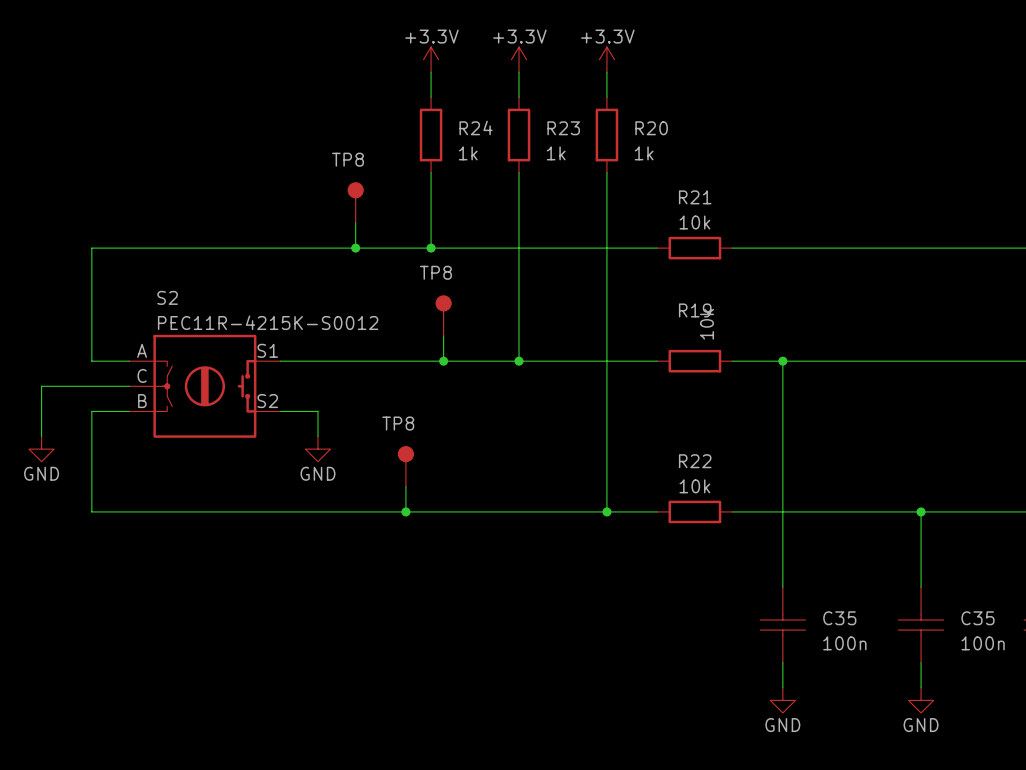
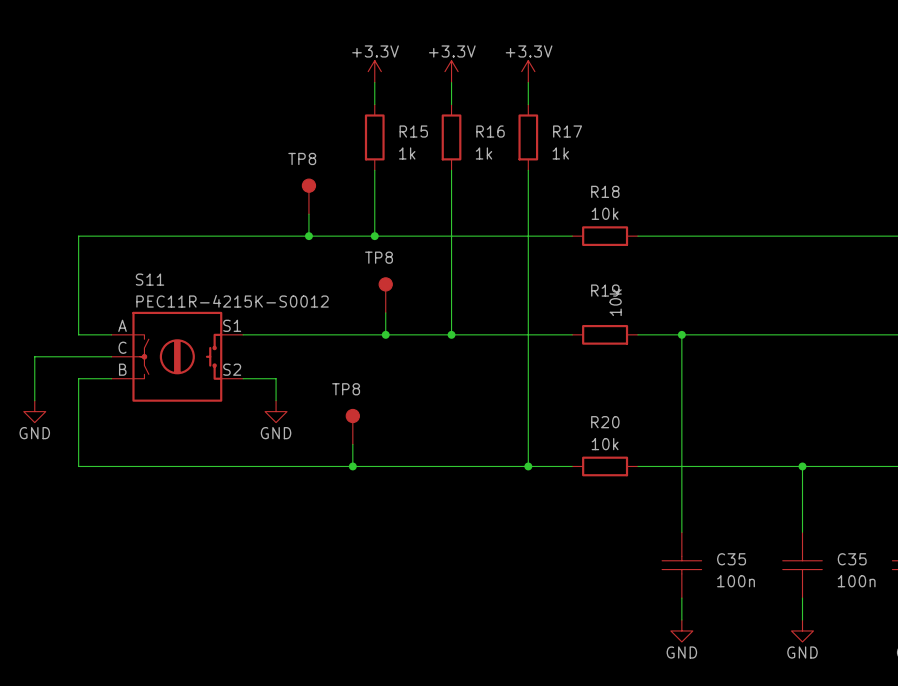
R24 name: R24 (476, 127) -> R15 (413, 131)
R23 name: R23 (563, 128) -> R16 (490, 131)
R20 name: R20 (651, 128) -> R17 (567, 131)
R21 name: R21 (695, 197) -> R18 (605, 191)
S2 name: S2 (167, 297) -> S11 (150, 279)
R22 name: R22 (695, 461) -> R20 (605, 422)

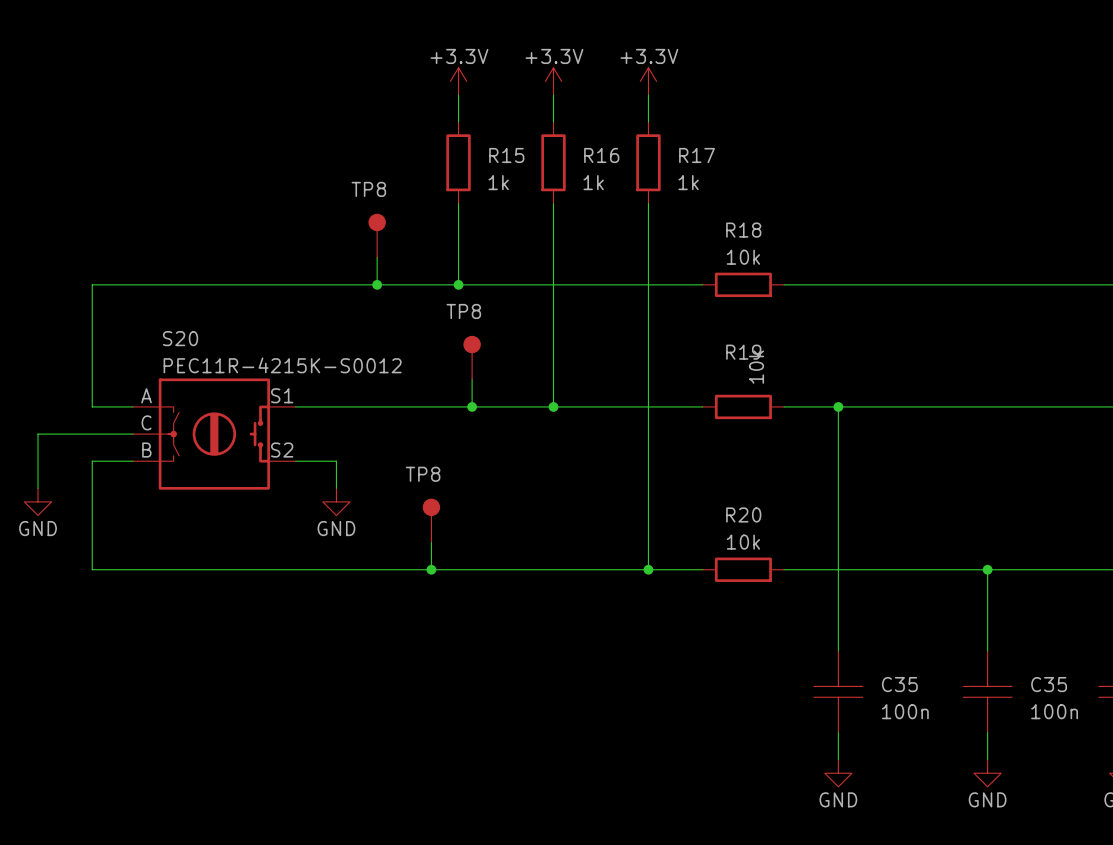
S11 name: S11 (150, 279) -> S20 (180, 338)

